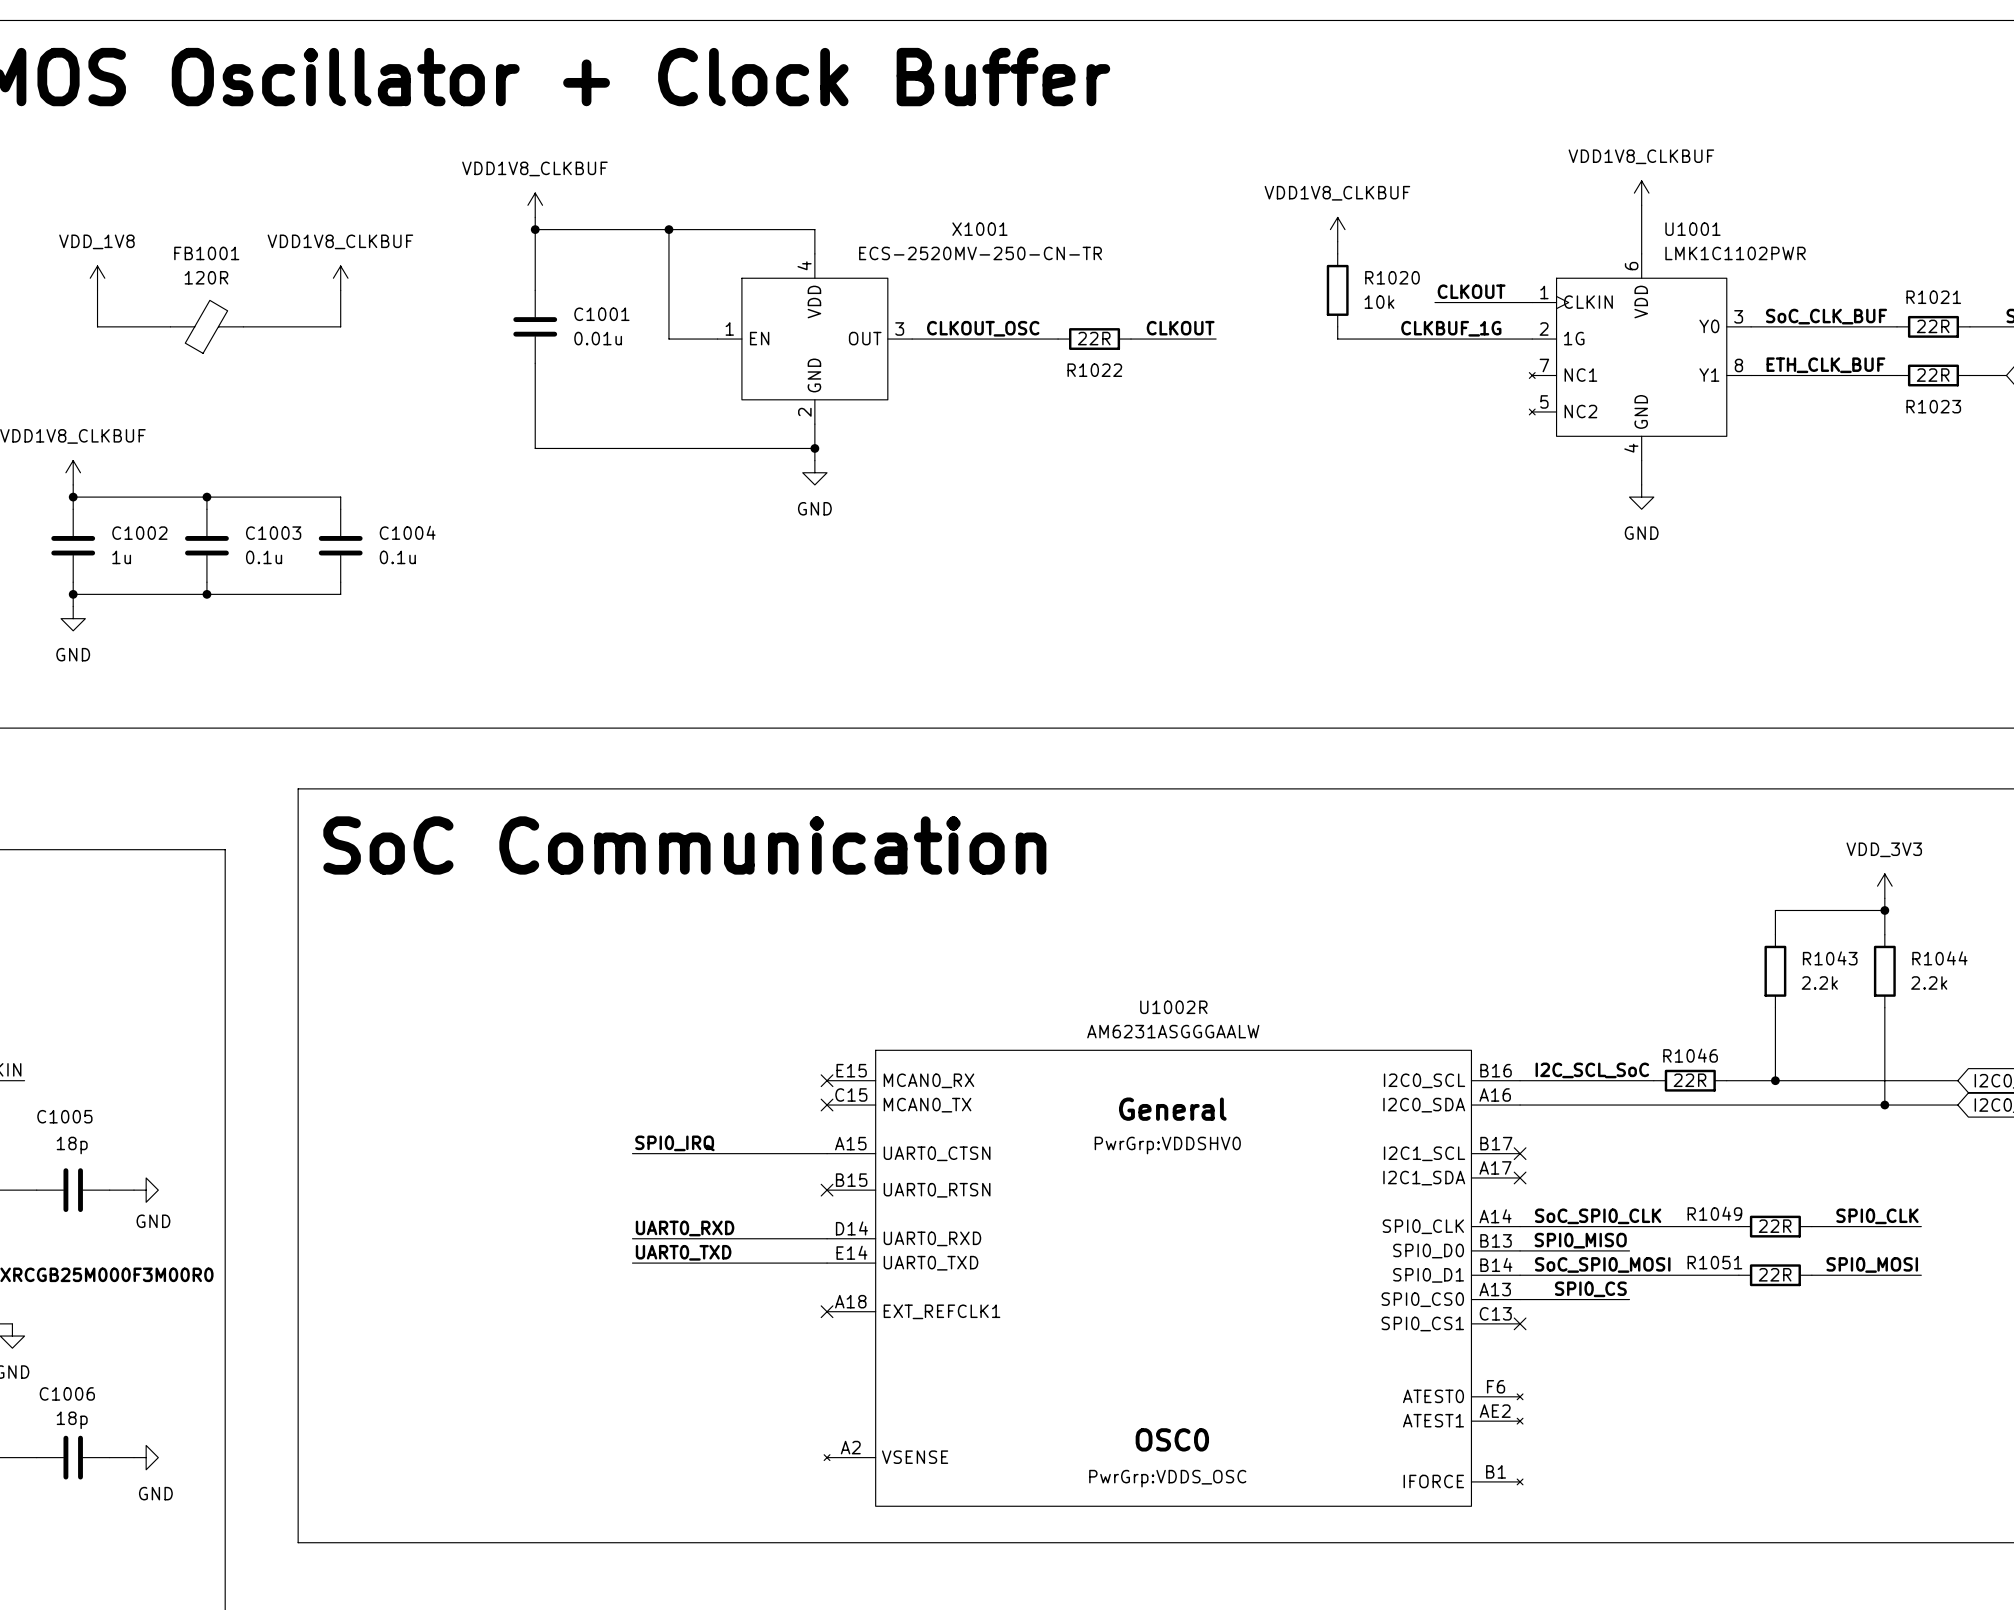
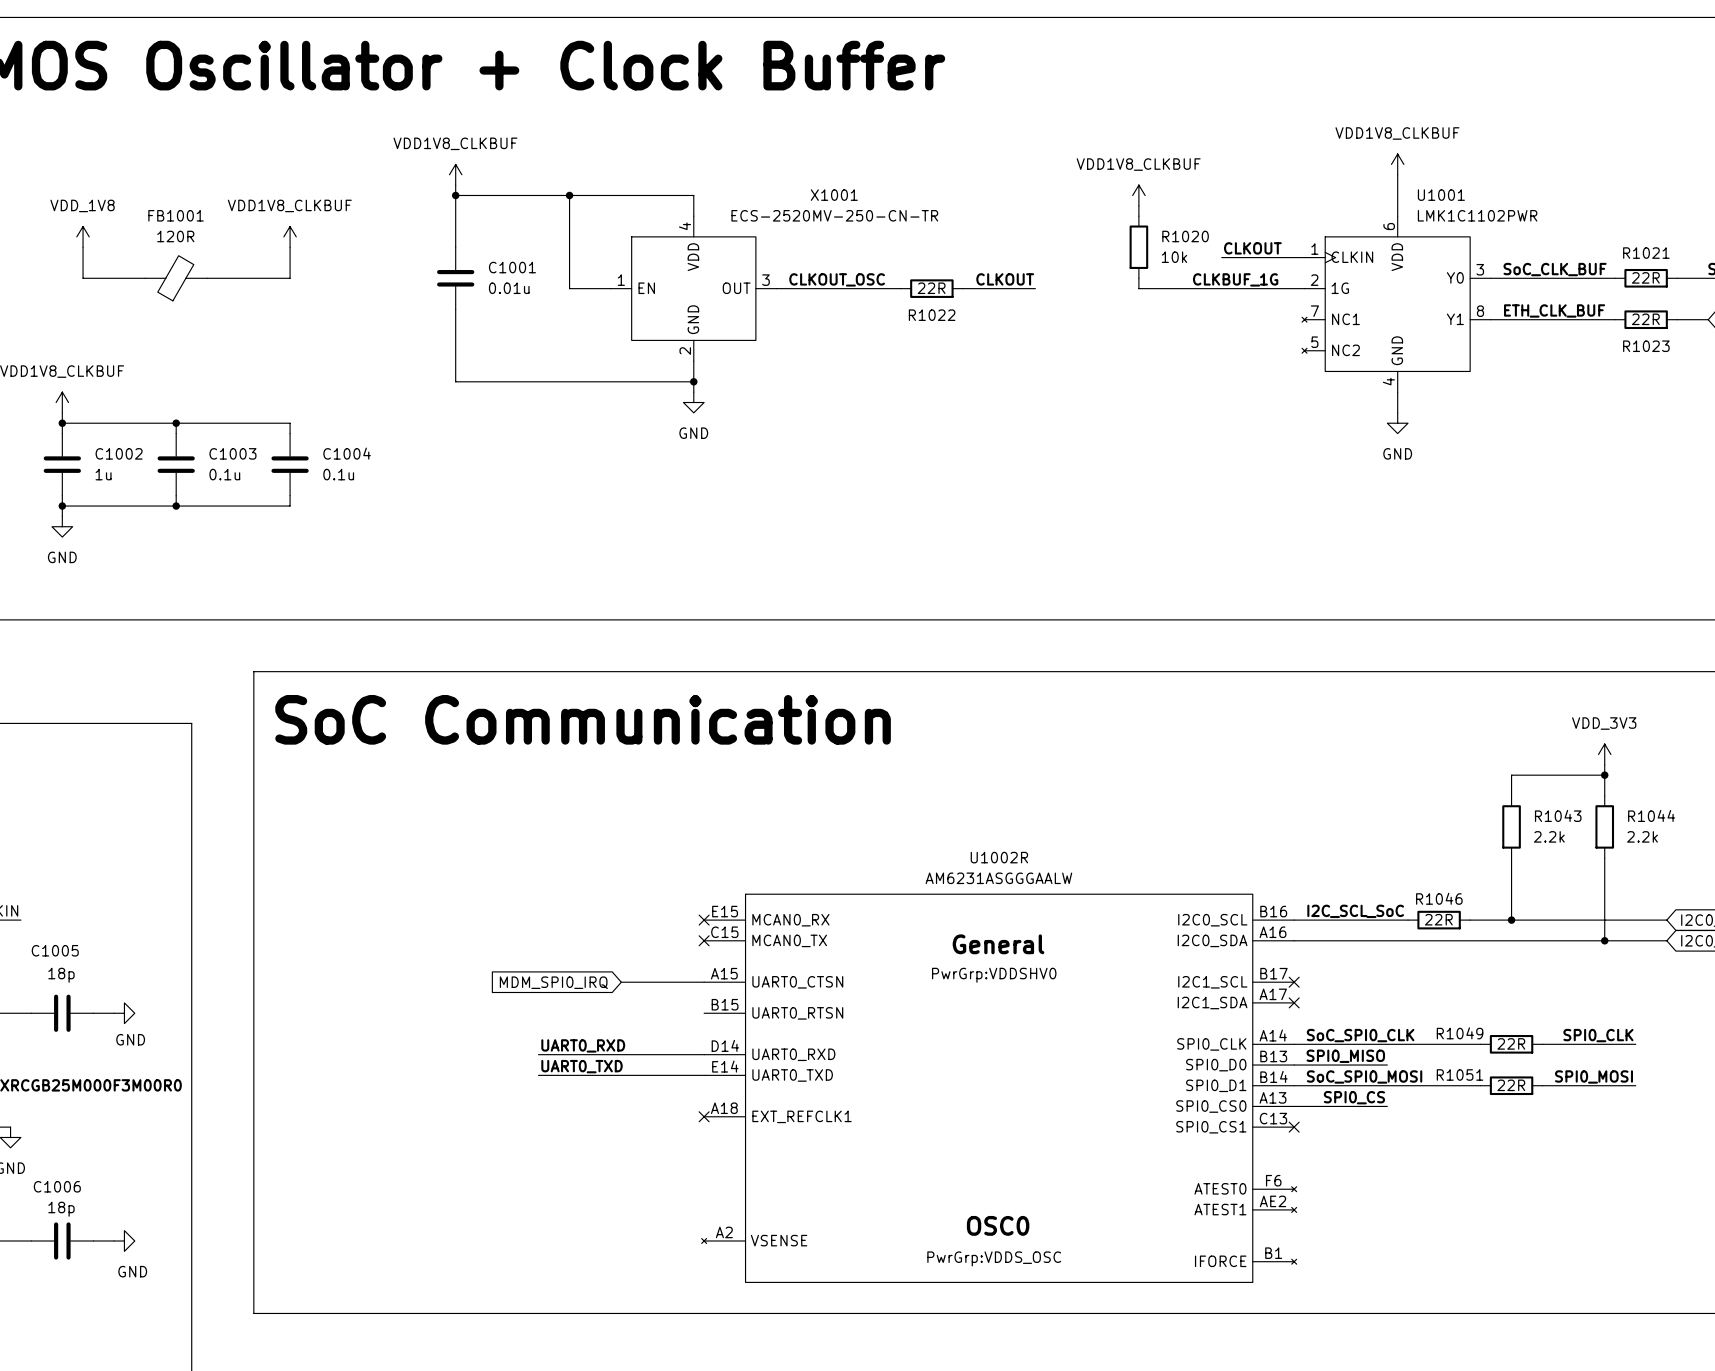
label: SPI0_IRQ (674, 1143) -> none
wire: (632, 1153) (729, 1153) -> none
global label: none -> MDM_SPI0_IRQ (553, 982)
no-connect mark: (827, 1190) -> none

